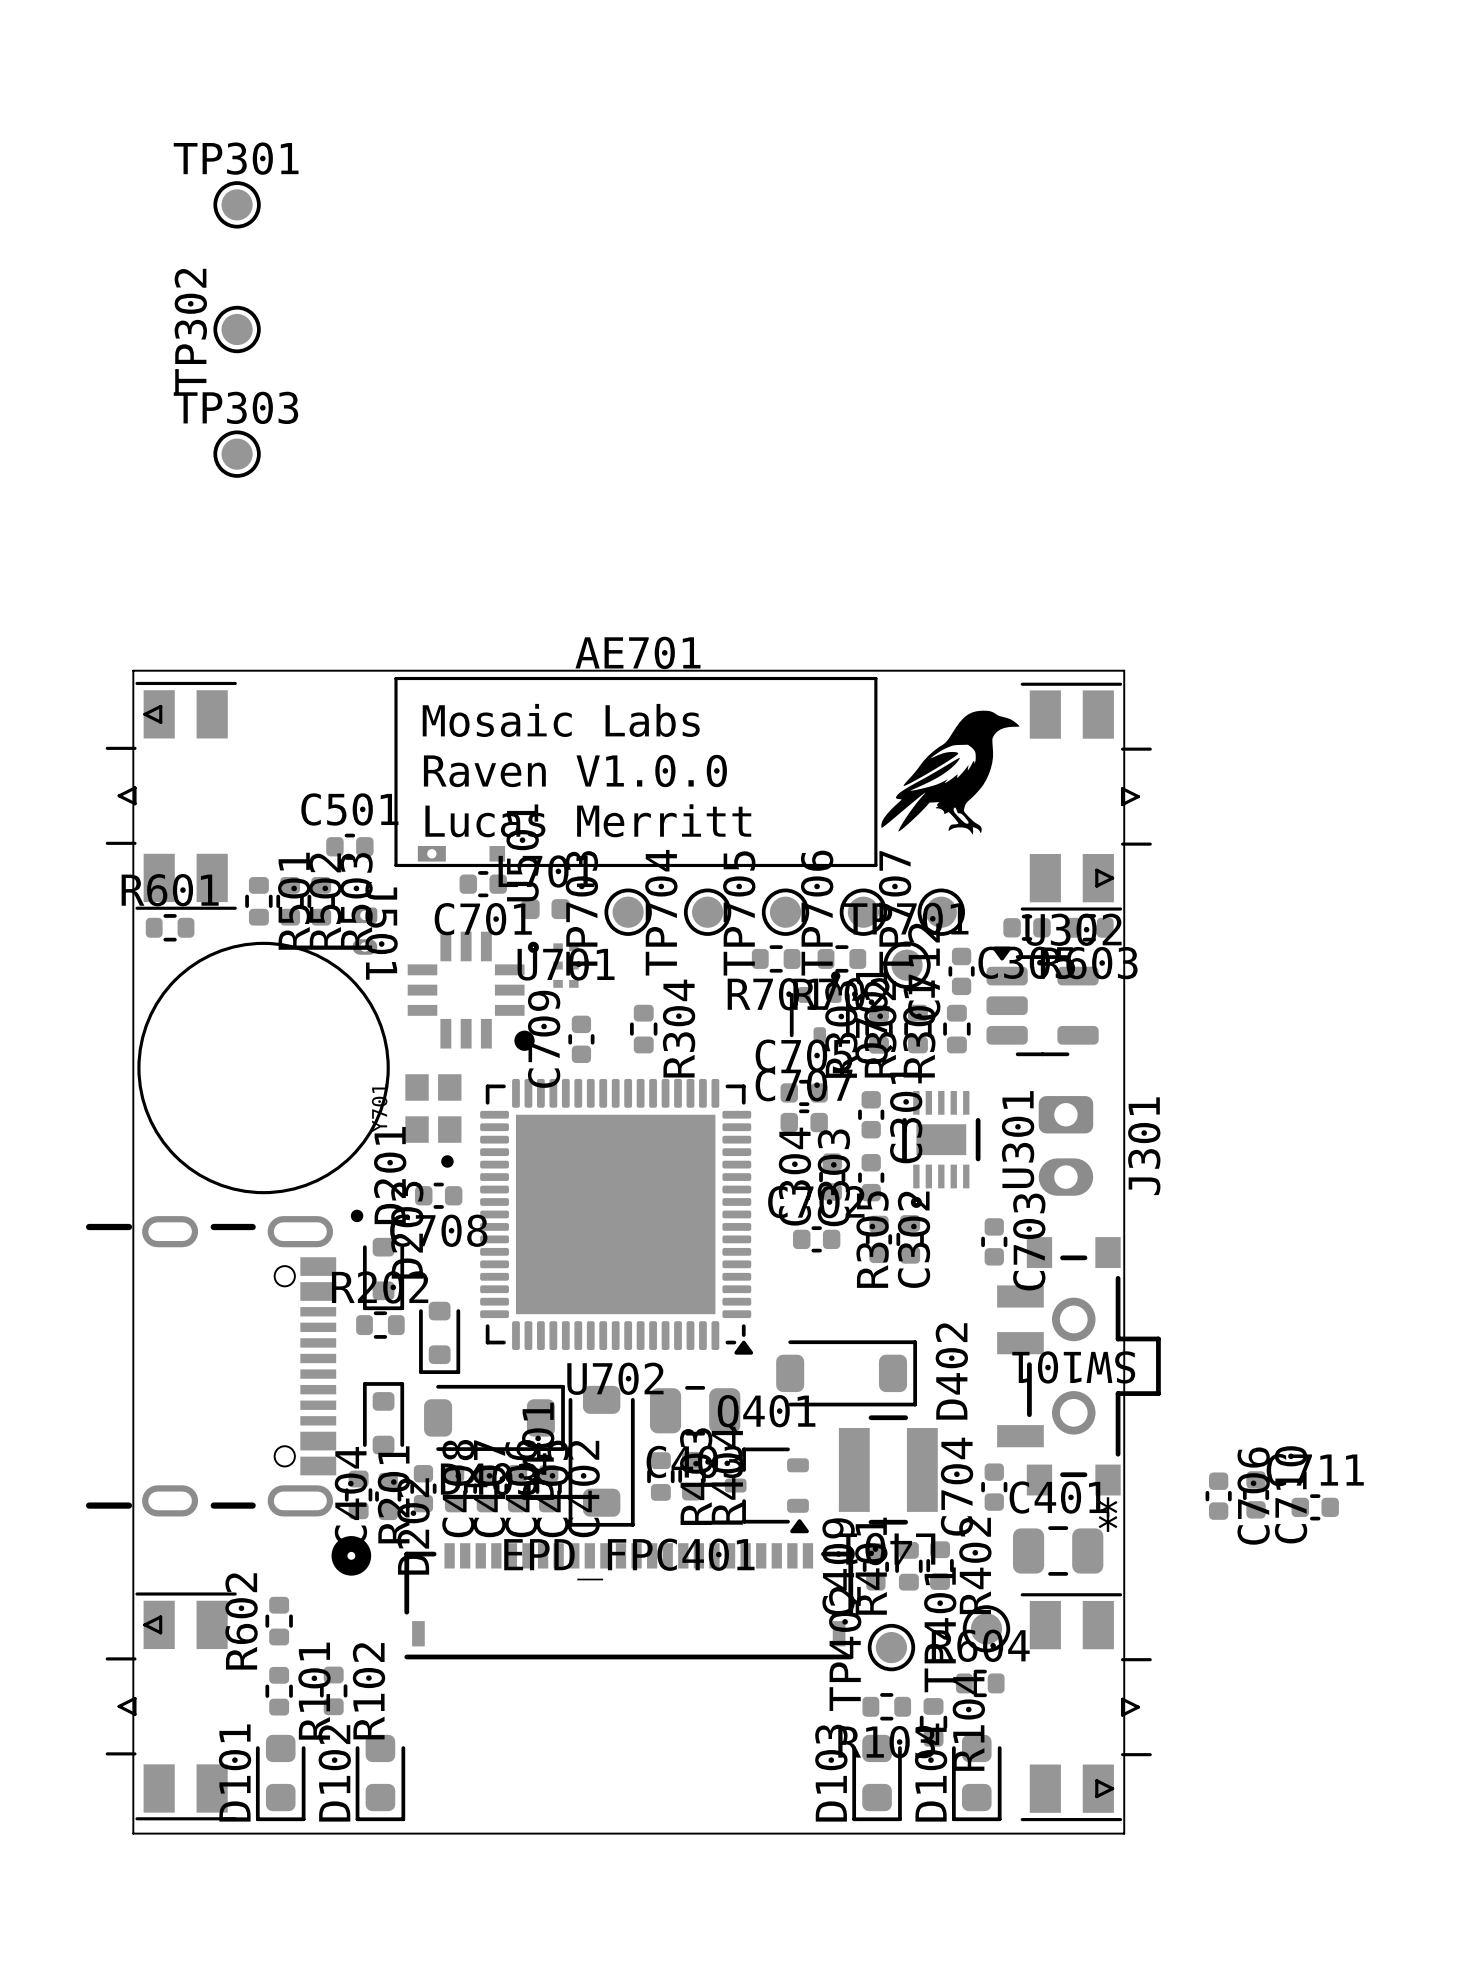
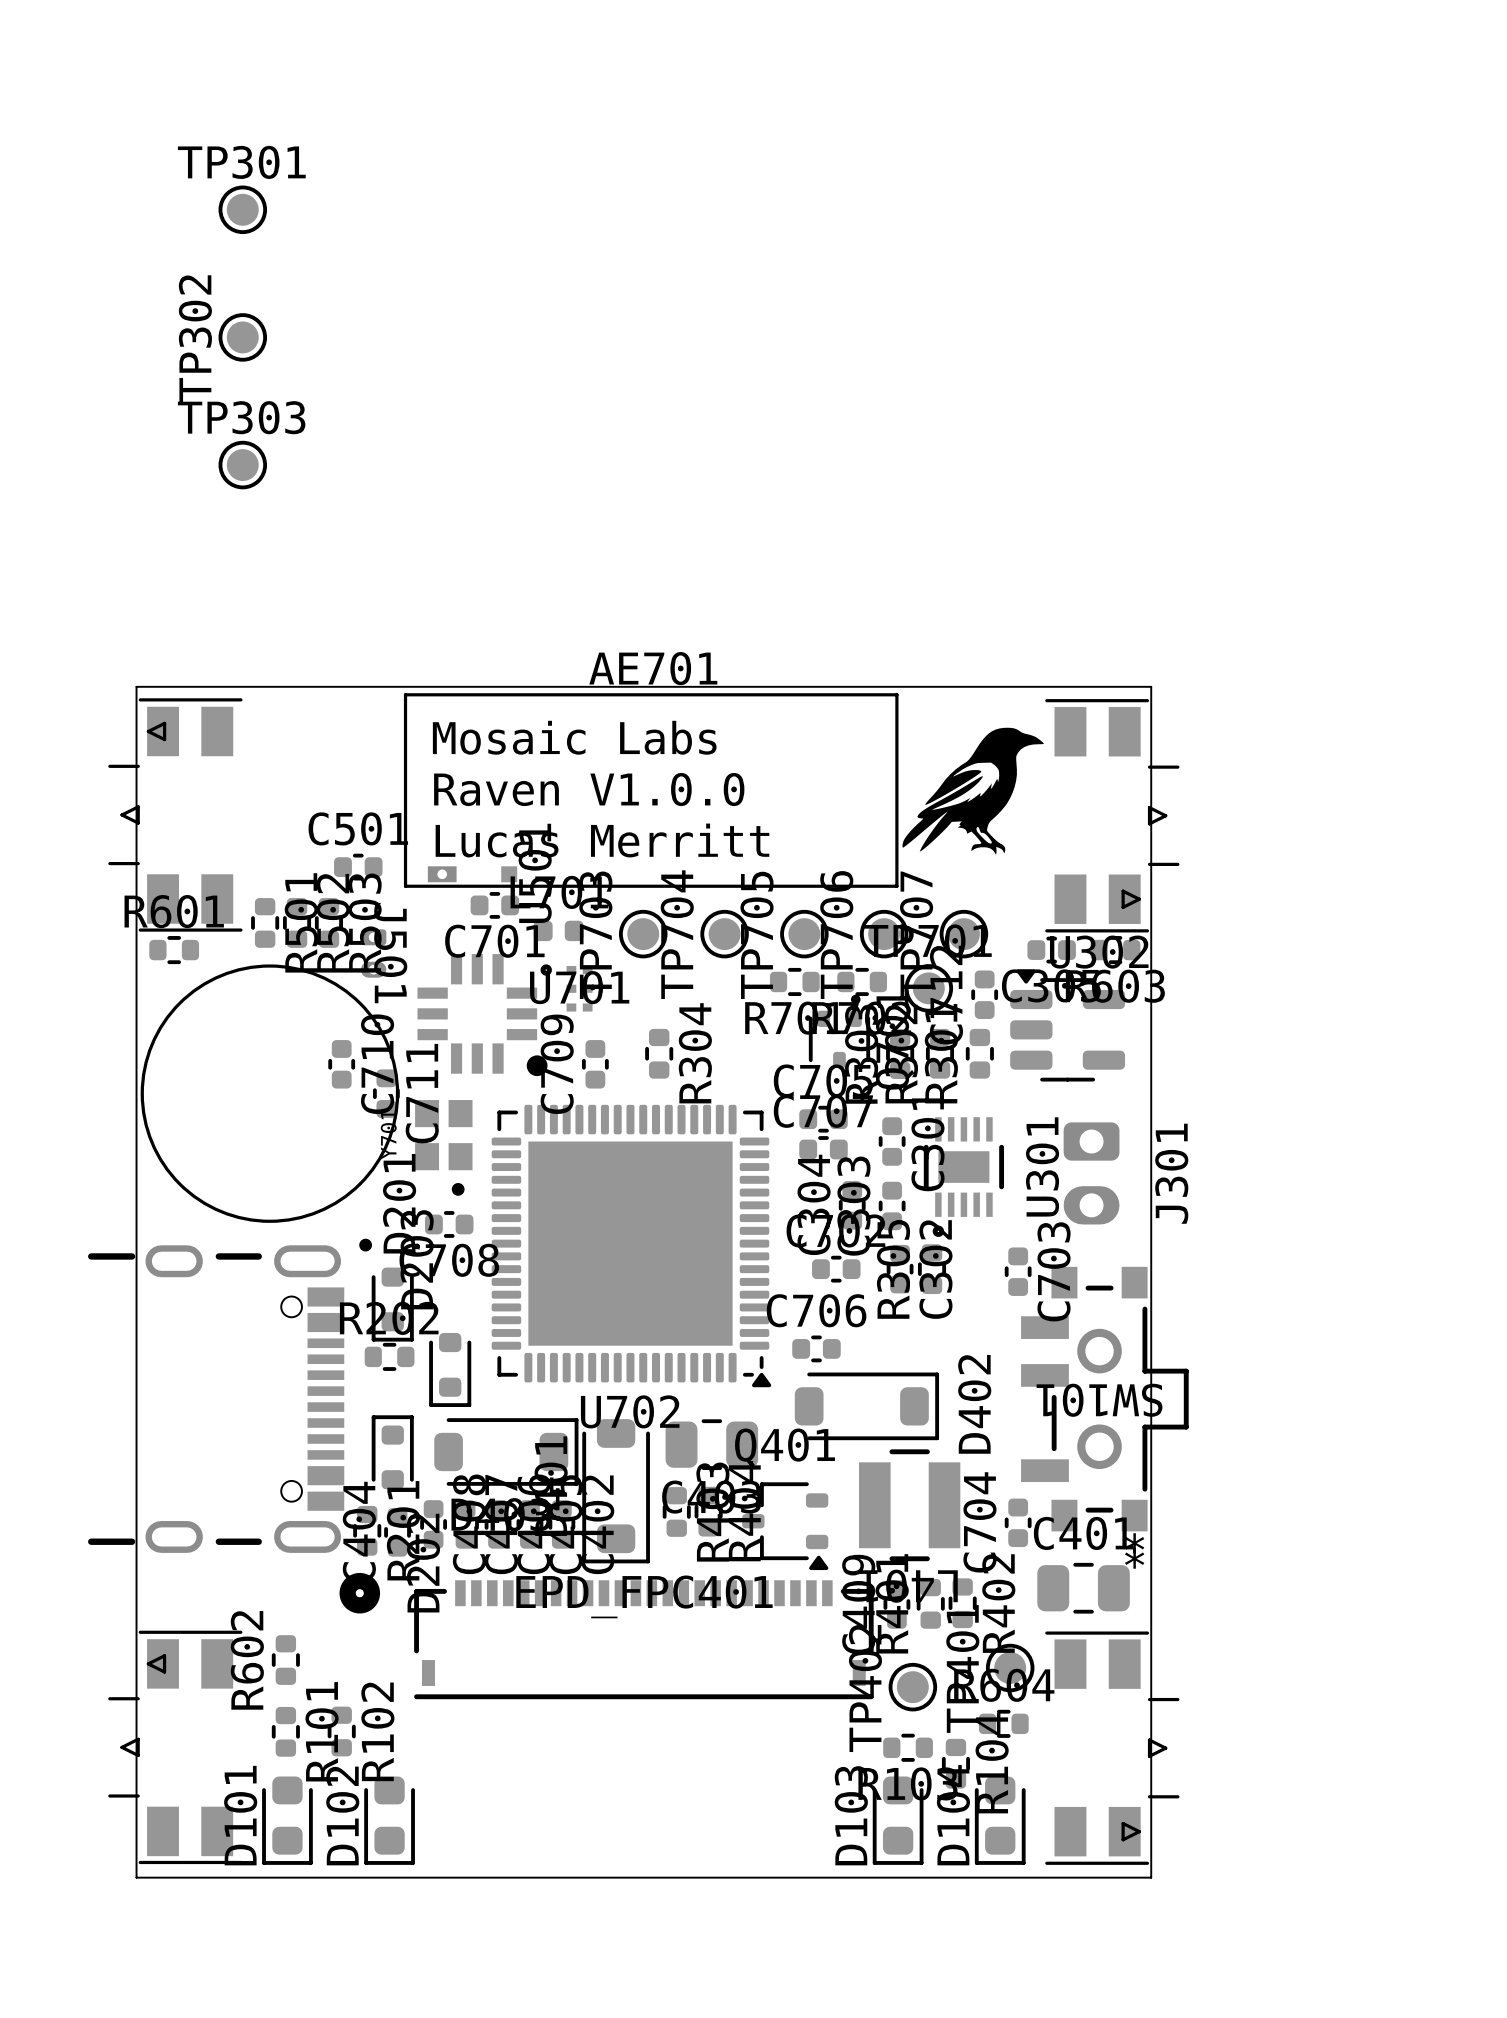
C710 position: (1256, 1494) -> (341, 1064)
C706 rotation: 0° (1218, 1496) -> 90° clockwise (816, 1348)
C706 position: (1218, 1496) -> (816, 1348)
C711 rotation: 0° (1315, 1507) -> 90° clockwise (386, 1093)
C711 position: (1315, 1507) -> (386, 1093)

